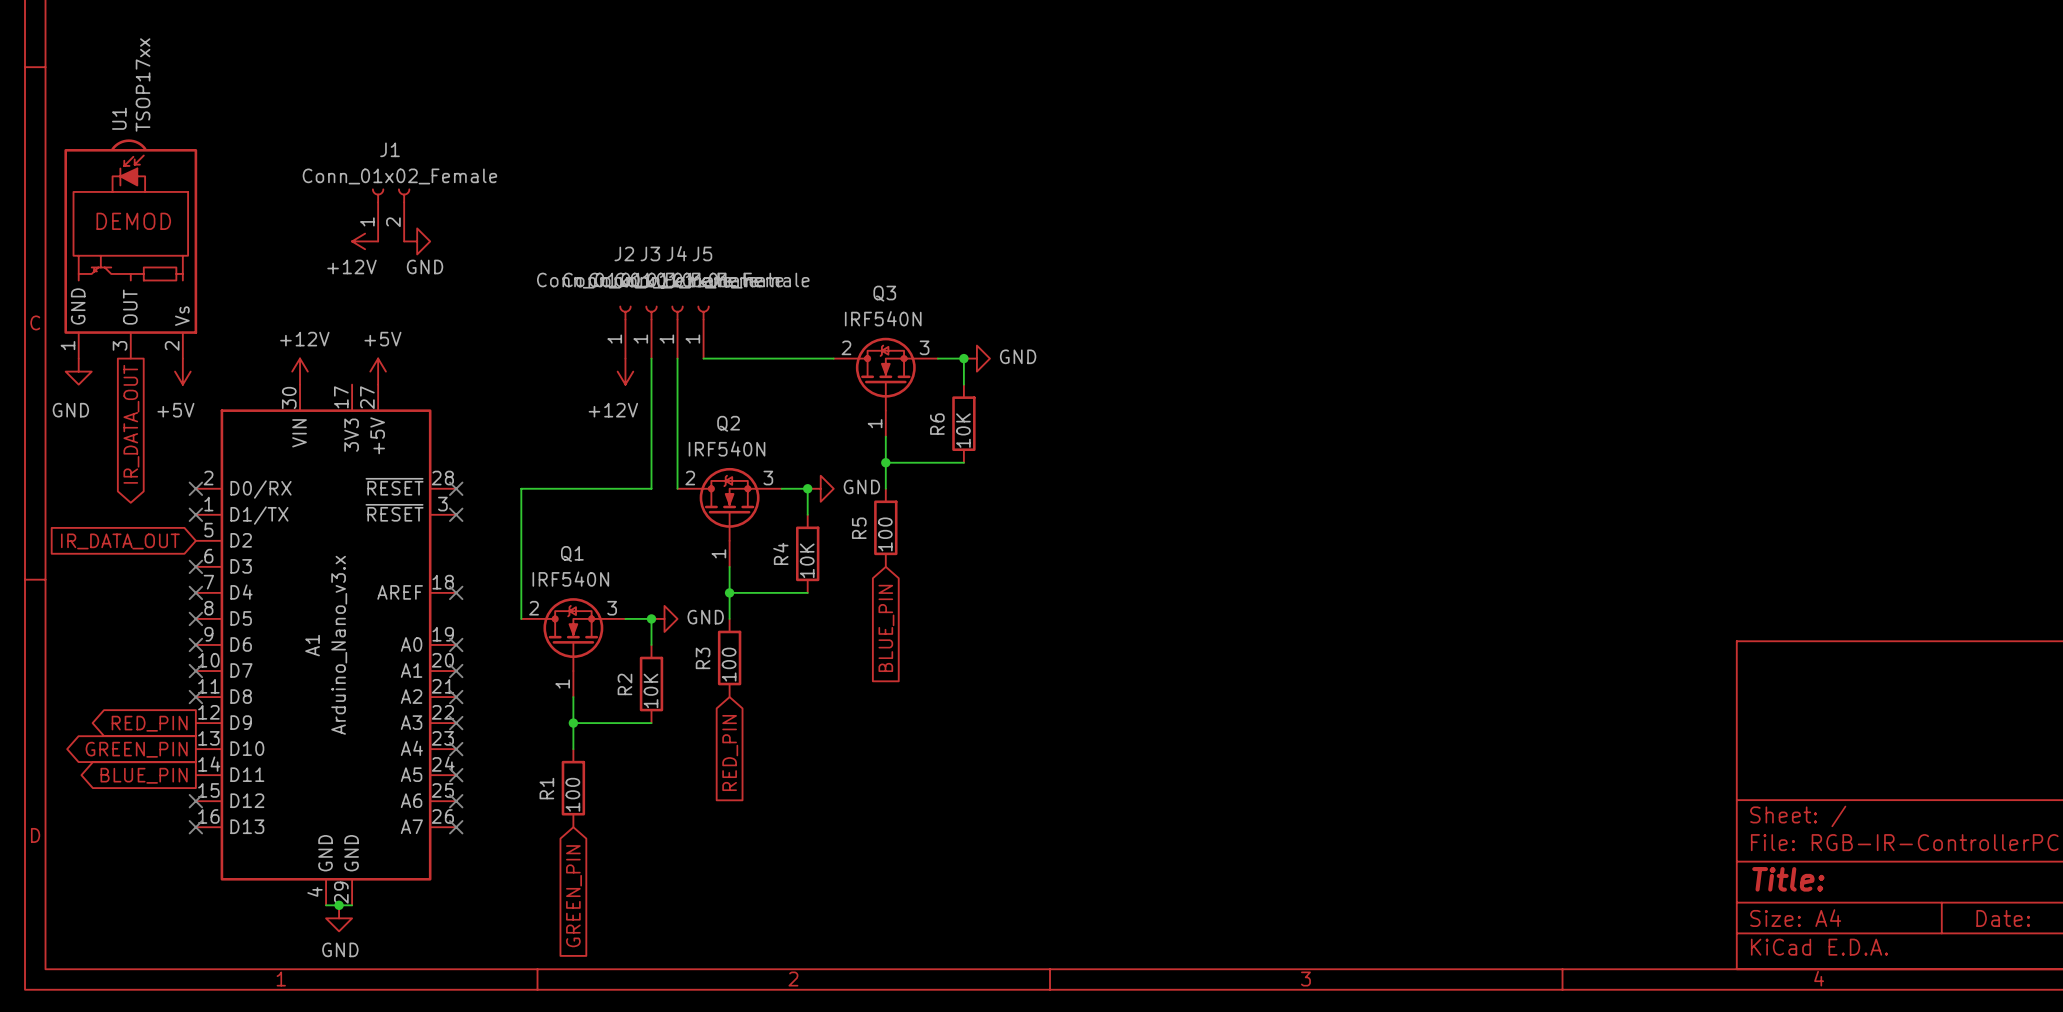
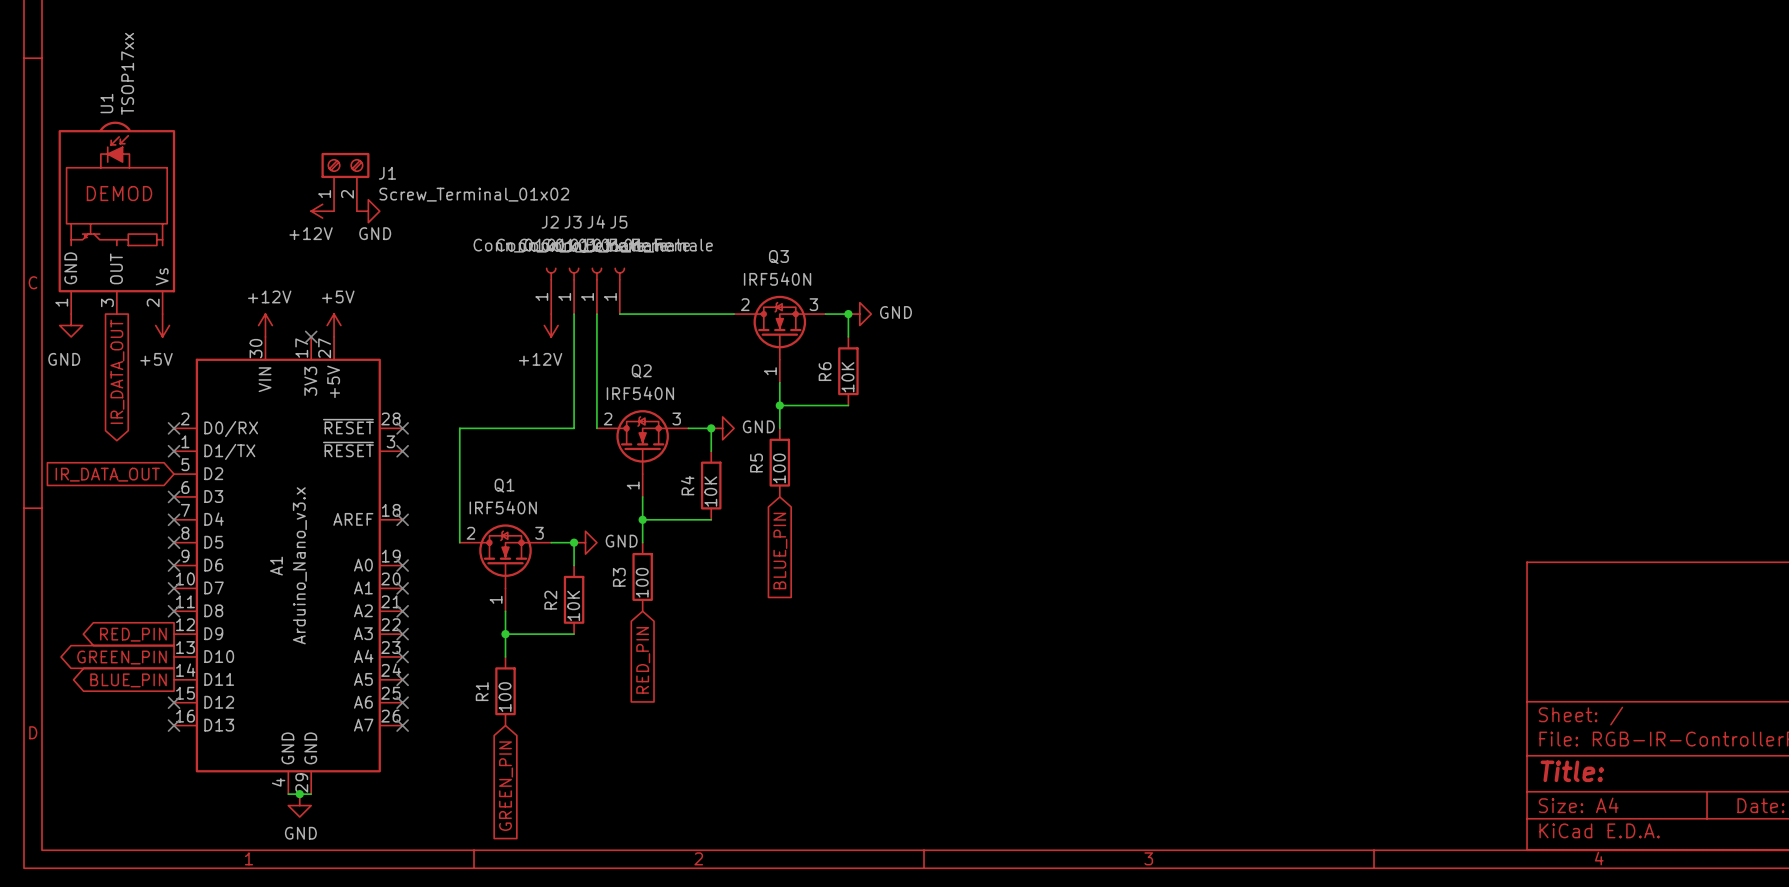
J1 name position: J1 (390, 149) -> J1 (387, 173)
J1 value: Conn_01x02_Female (399, 176) -> Screw_Terminal_01x02 (474, 194)
J1 symbol: [372, 188, 411, 242] -> [321, 152, 370, 212]
no-connect mark: none -> (311, 336)

